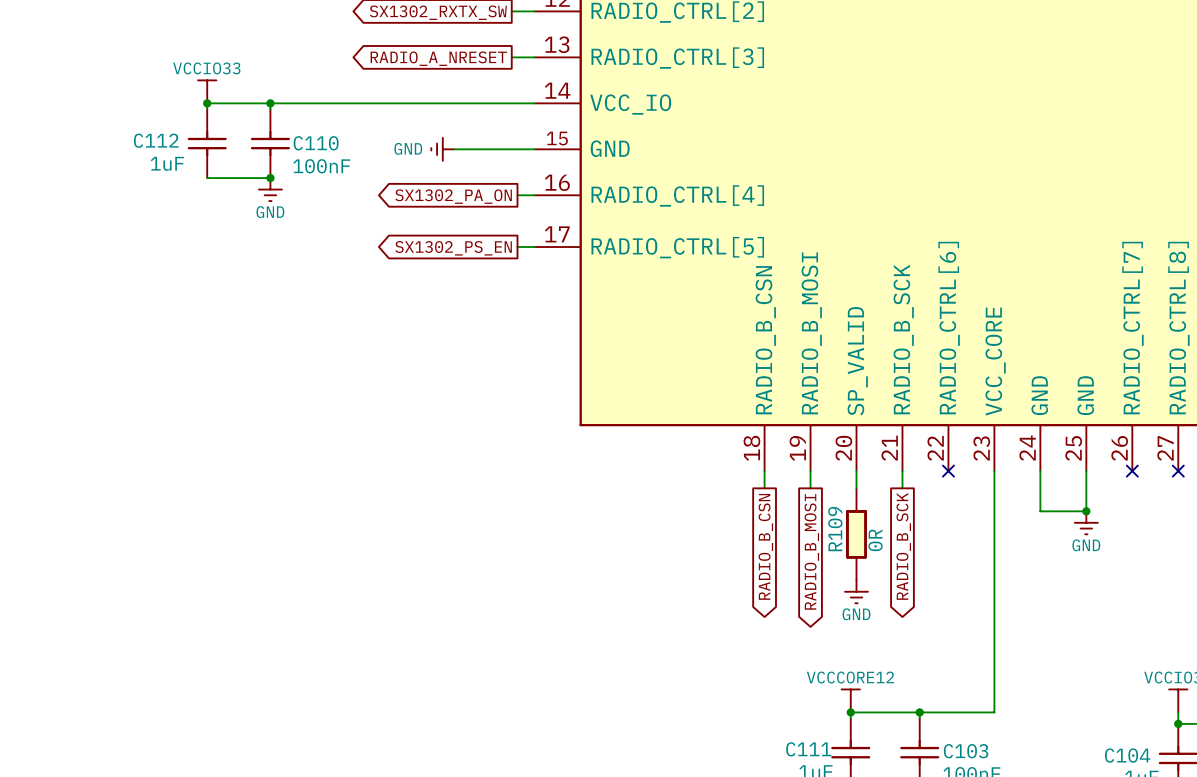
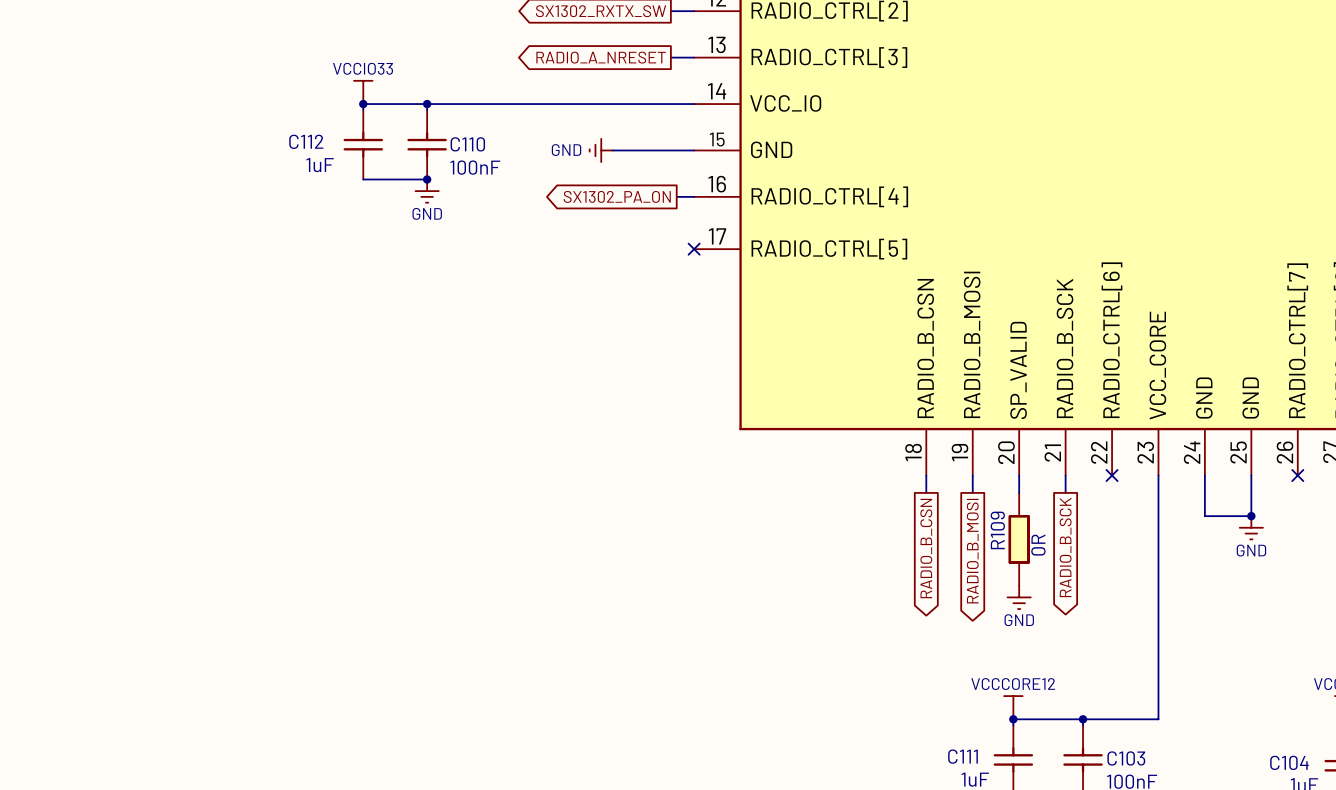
wire: (517, 247) (534, 247) -> none
no-connect mark: none -> (694, 249)
global label: SX1302_PS_EN (453, 248) -> none

